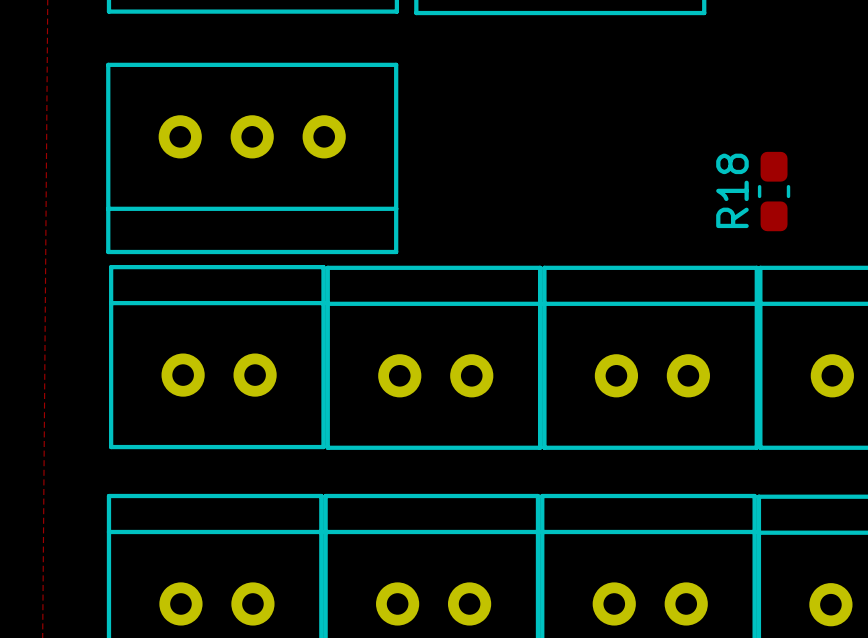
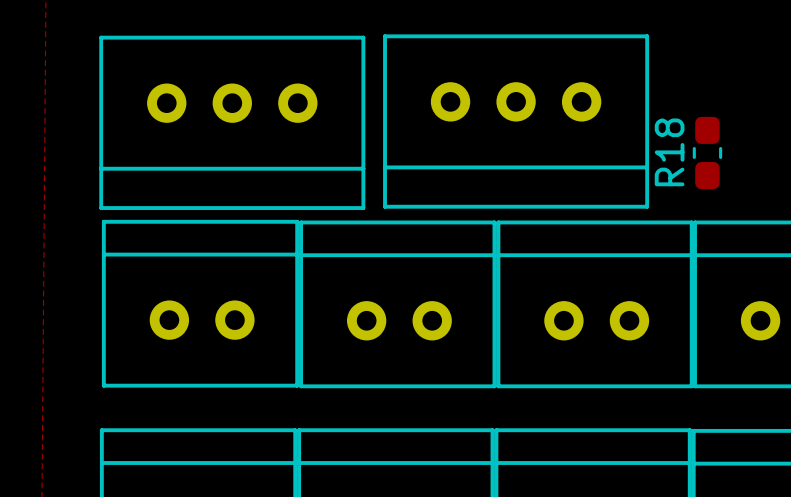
part: none -> (516, 121)

